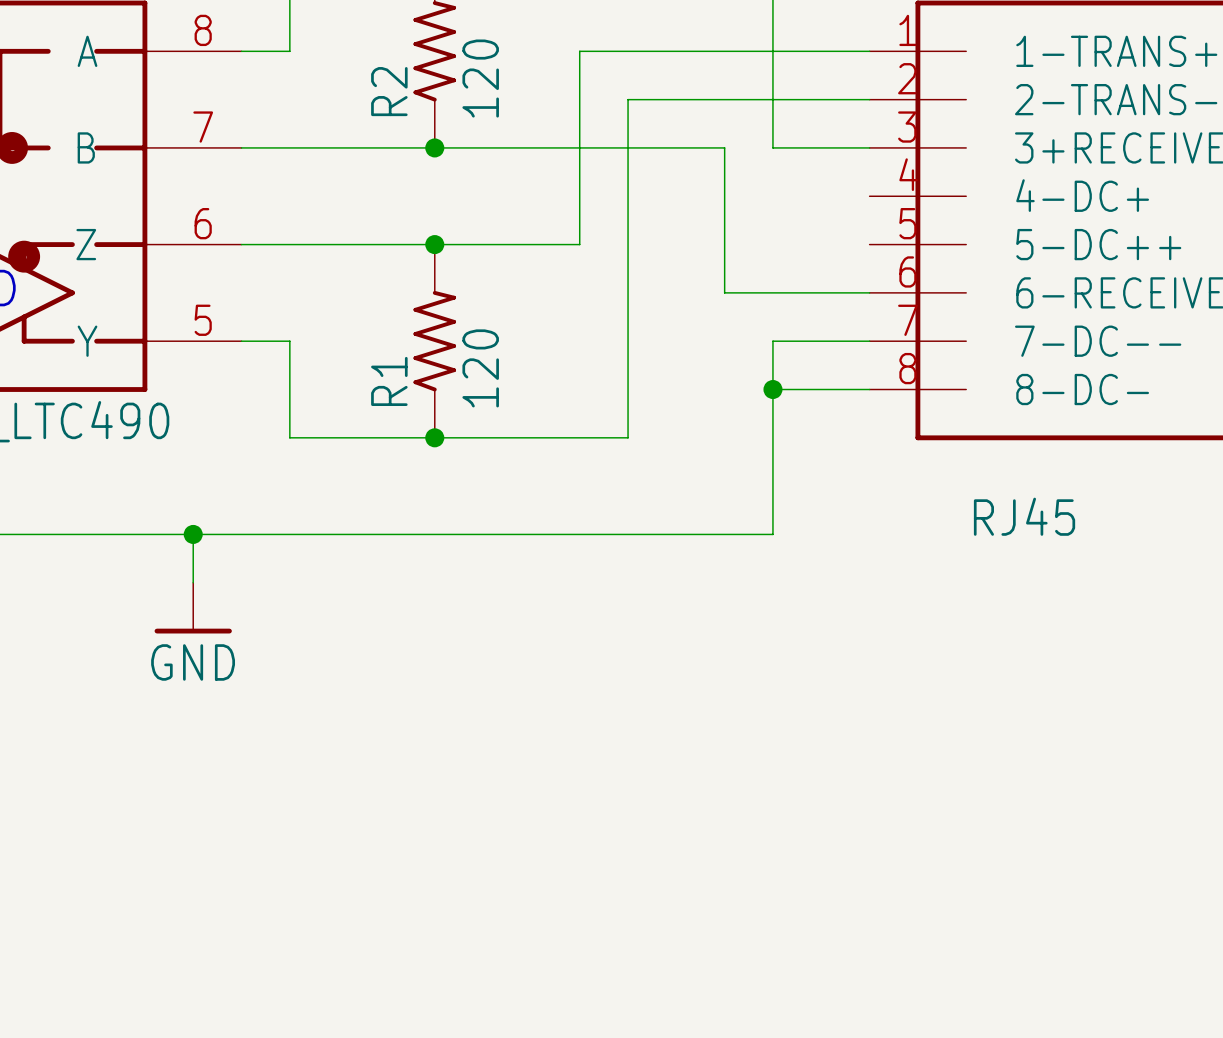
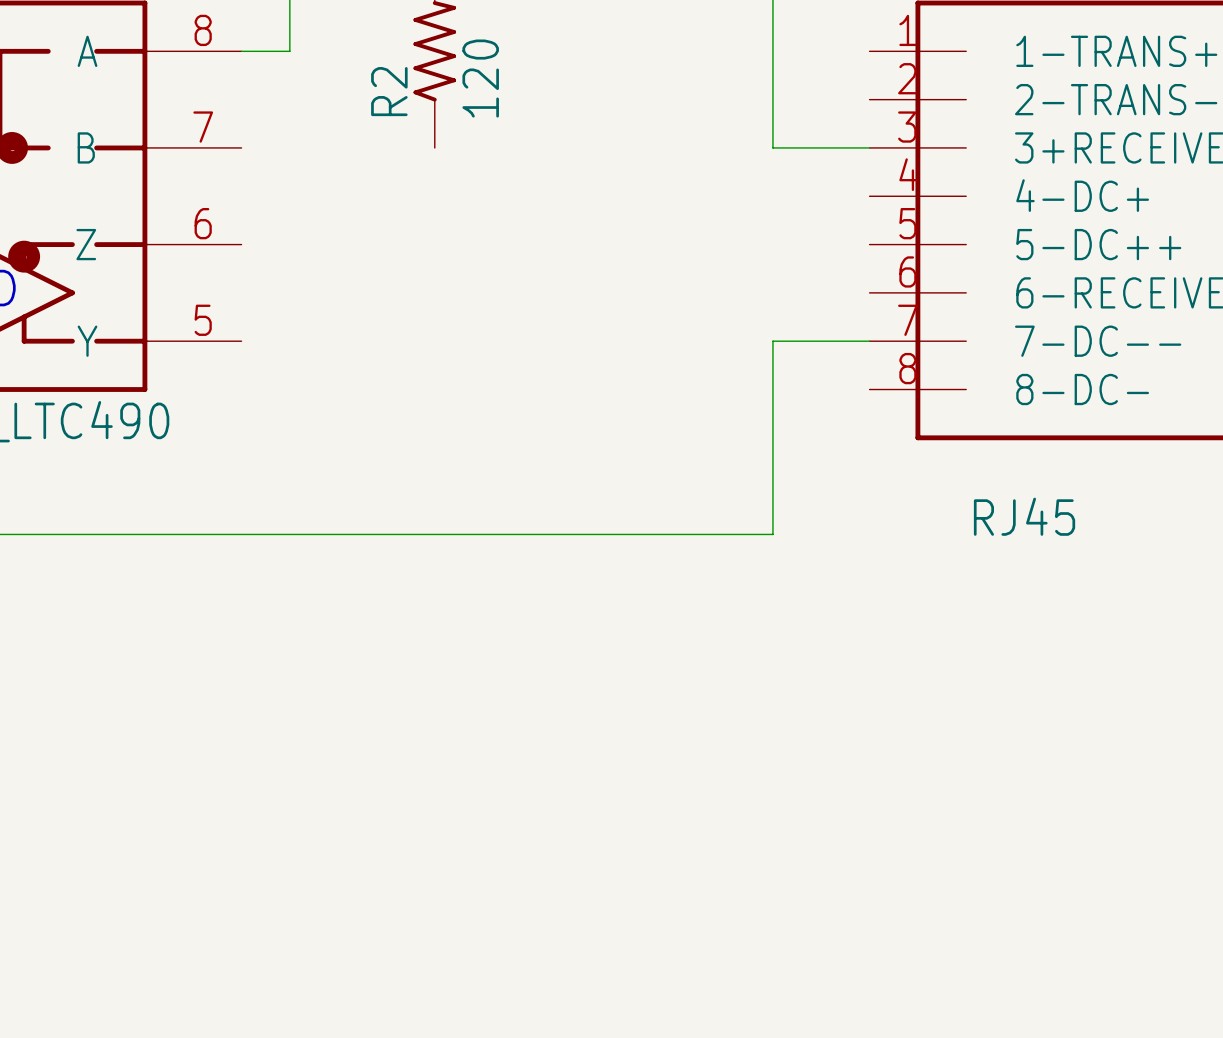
wire: (869, 51) (579, 51) (579, 244) (241, 244) -> none
wire: (869, 99) (628, 99) (628, 437) (289, 437) (289, 341) (241, 341) -> none
wire: (241, 147) (724, 147) (724, 292) (869, 292) -> none
junction: (434, 147) -> none
junction: (434, 244) -> none
R1: 120 (434, 341) -> none
wire: (772, 389) (869, 389) -> none
junction: (772, 389) -> none
junction: (434, 437) -> none
wire: (193, 534) (193, 582) -> none
junction: (193, 534) -> none
power symbol: GND (193, 608) -> none

